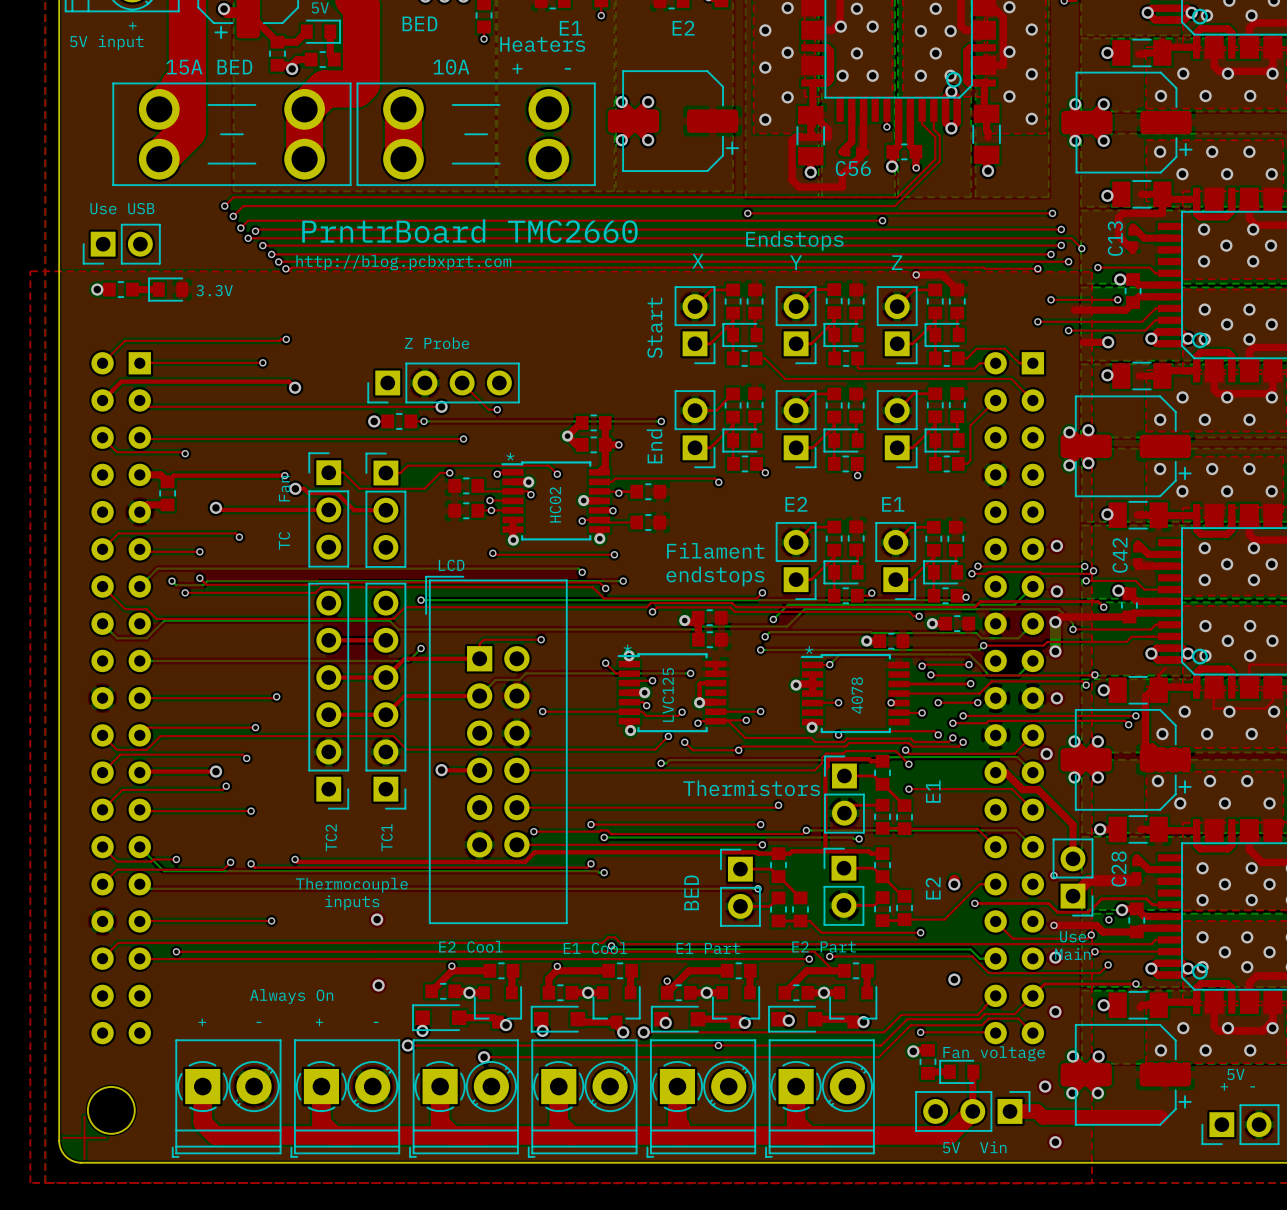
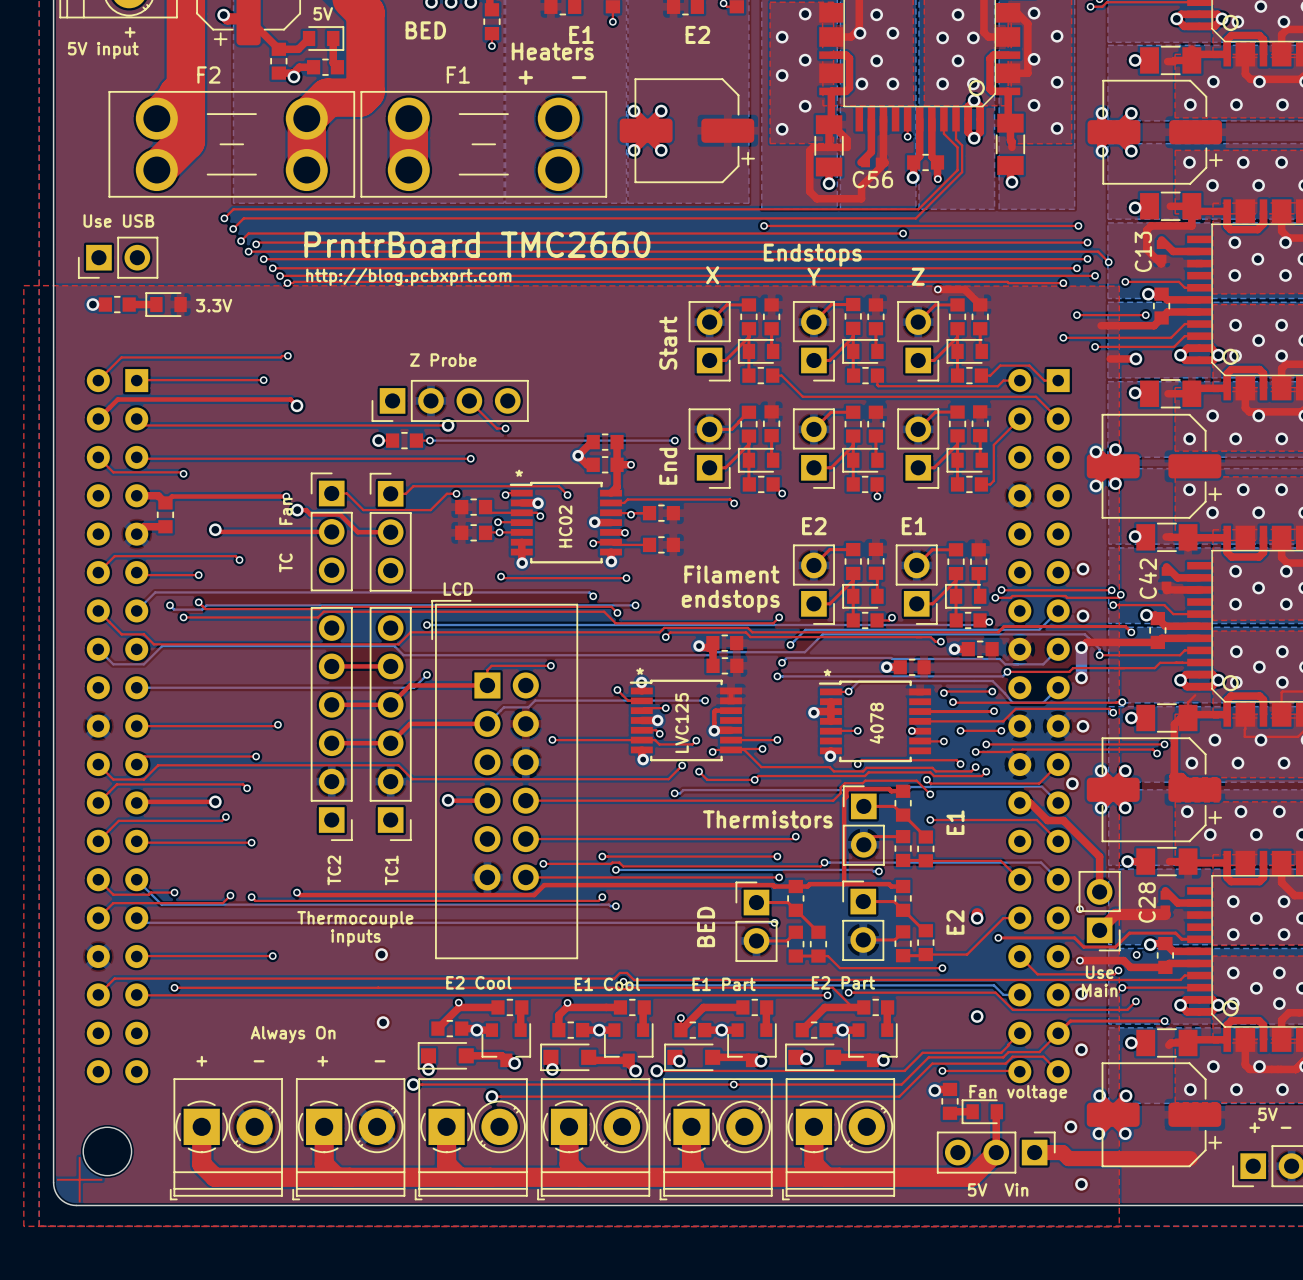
15A BED name: 15A BED (209, 67) -> F2 (208, 74)
10A name: 10A (451, 67) -> F1 (458, 74)

